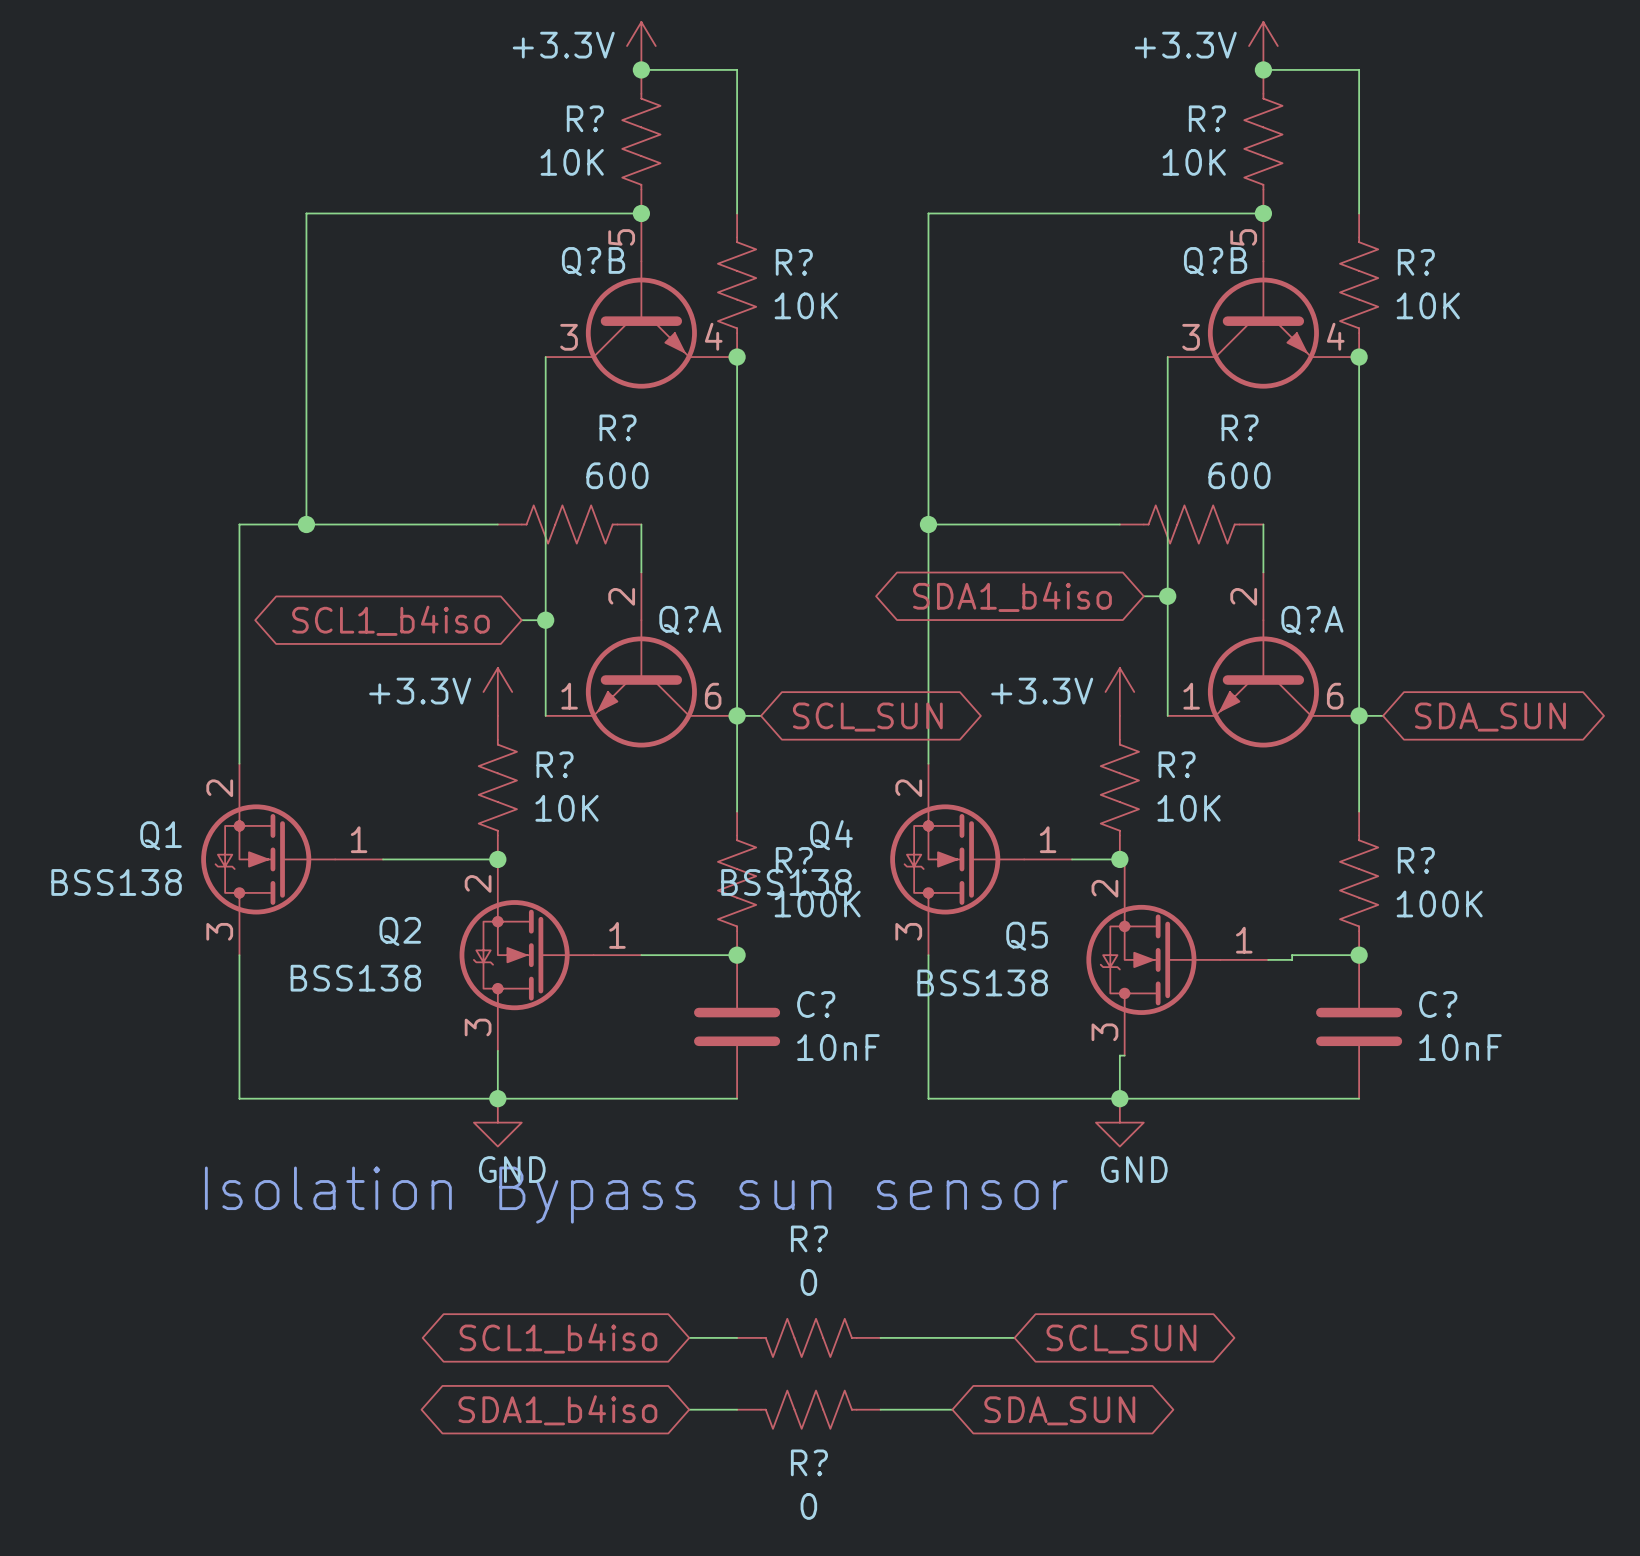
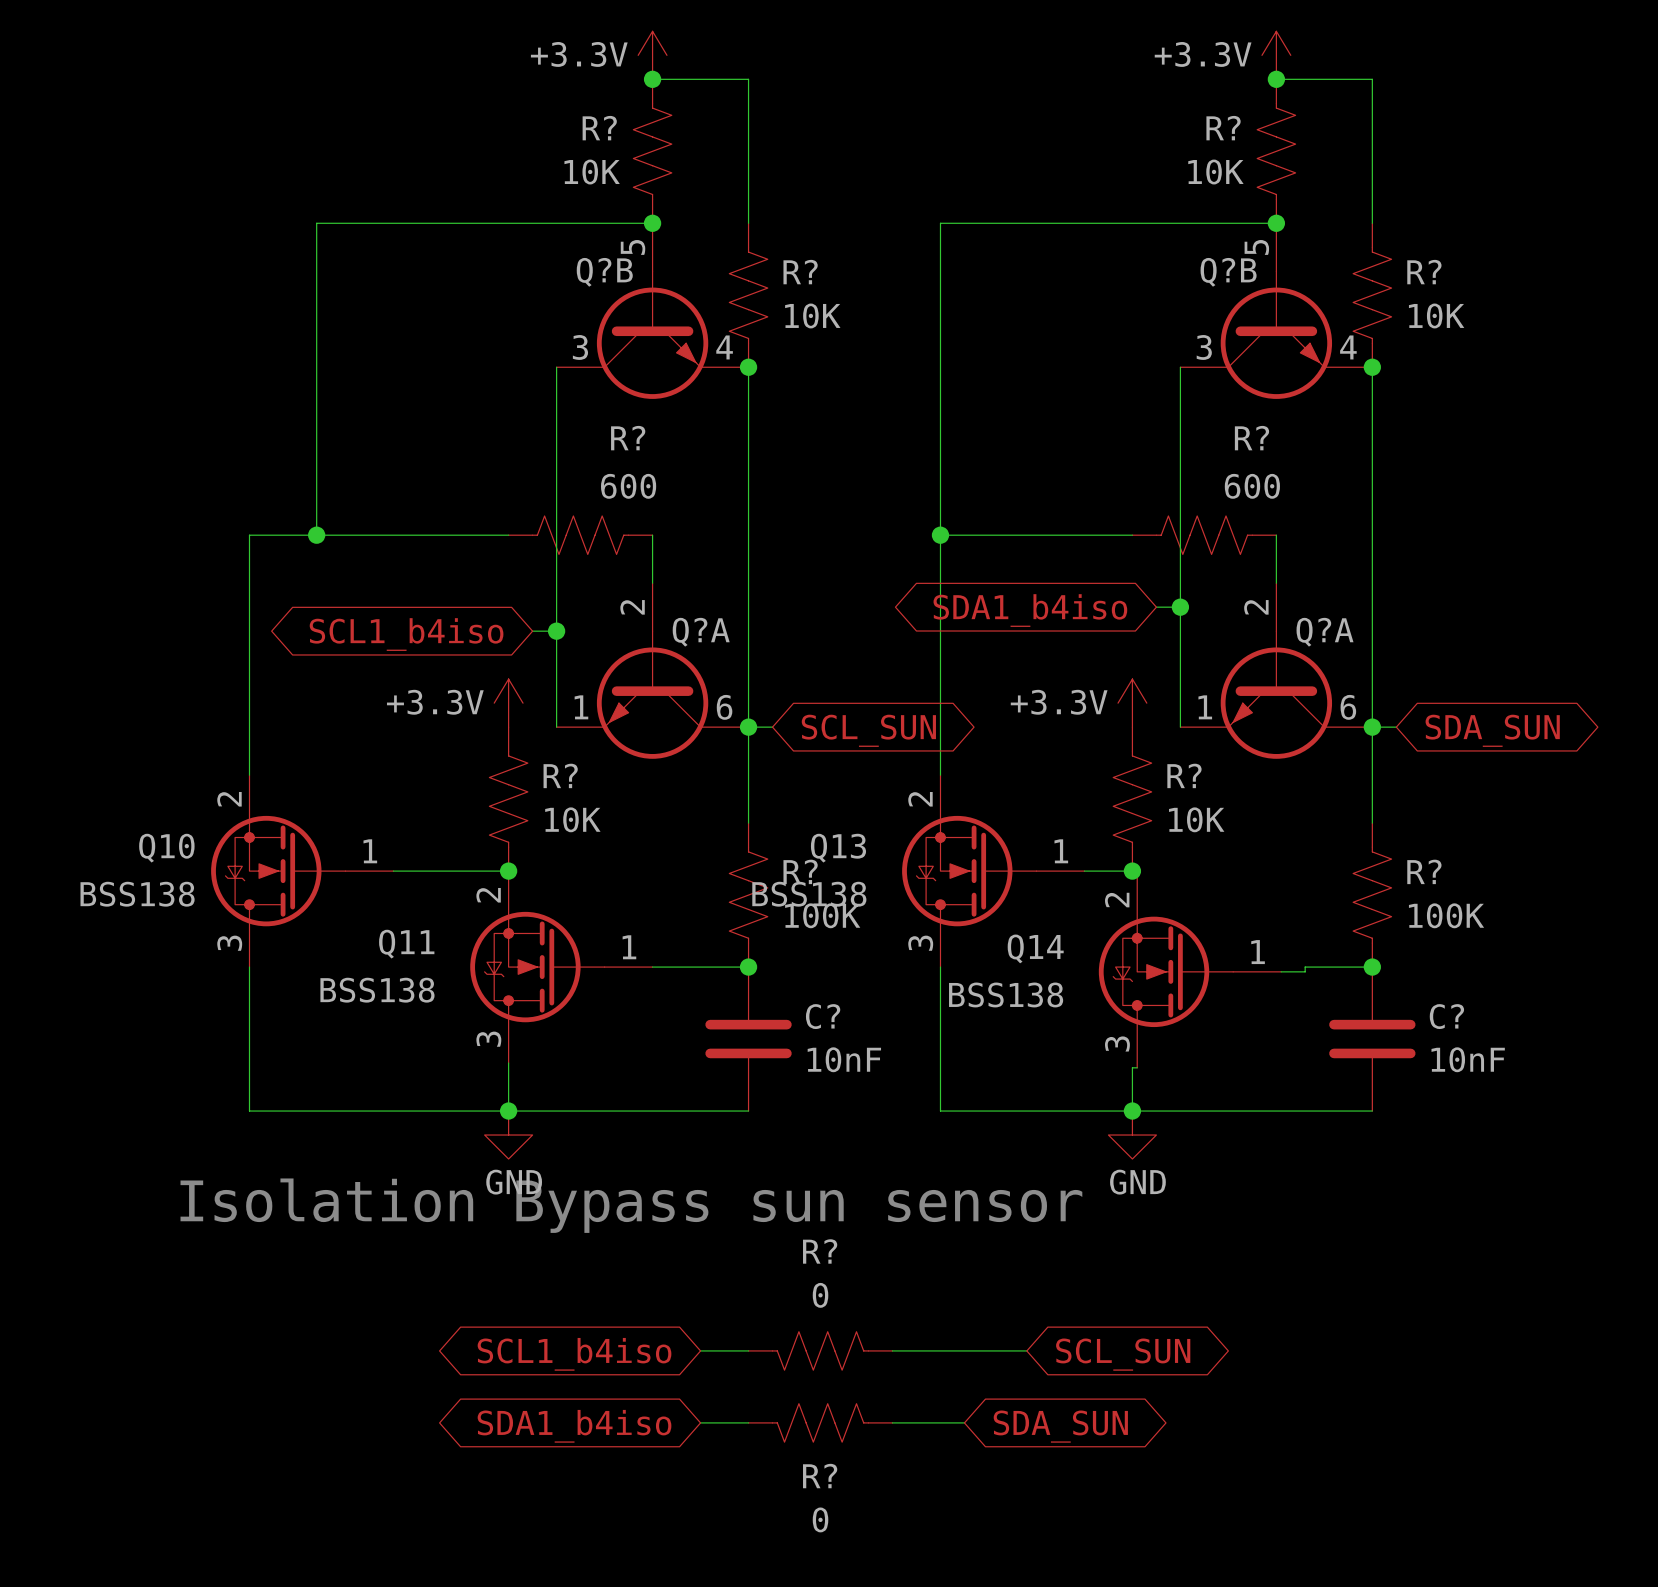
Q1 name: Q1 (161, 835) -> Q10 (166, 848)
Q4 name: Q4 (831, 835) -> Q13 (838, 848)
Q2 name: Q2 (400, 931) -> Q11 (406, 944)
Q5 name: Q5 (1027, 936) -> Q14 (1035, 948)

